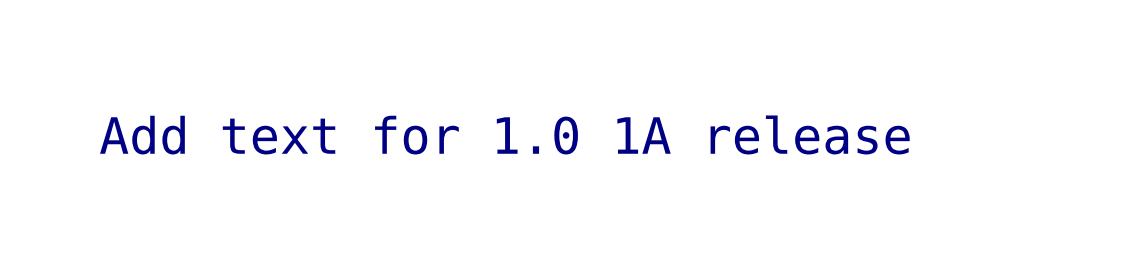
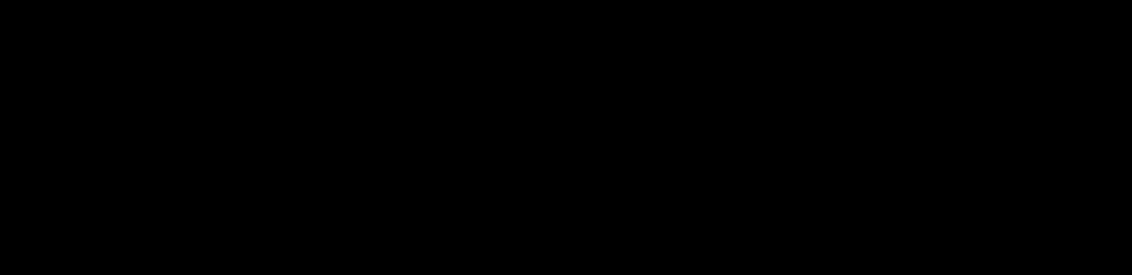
text: Add text for 1.0 1A release (504, 134) -> none

